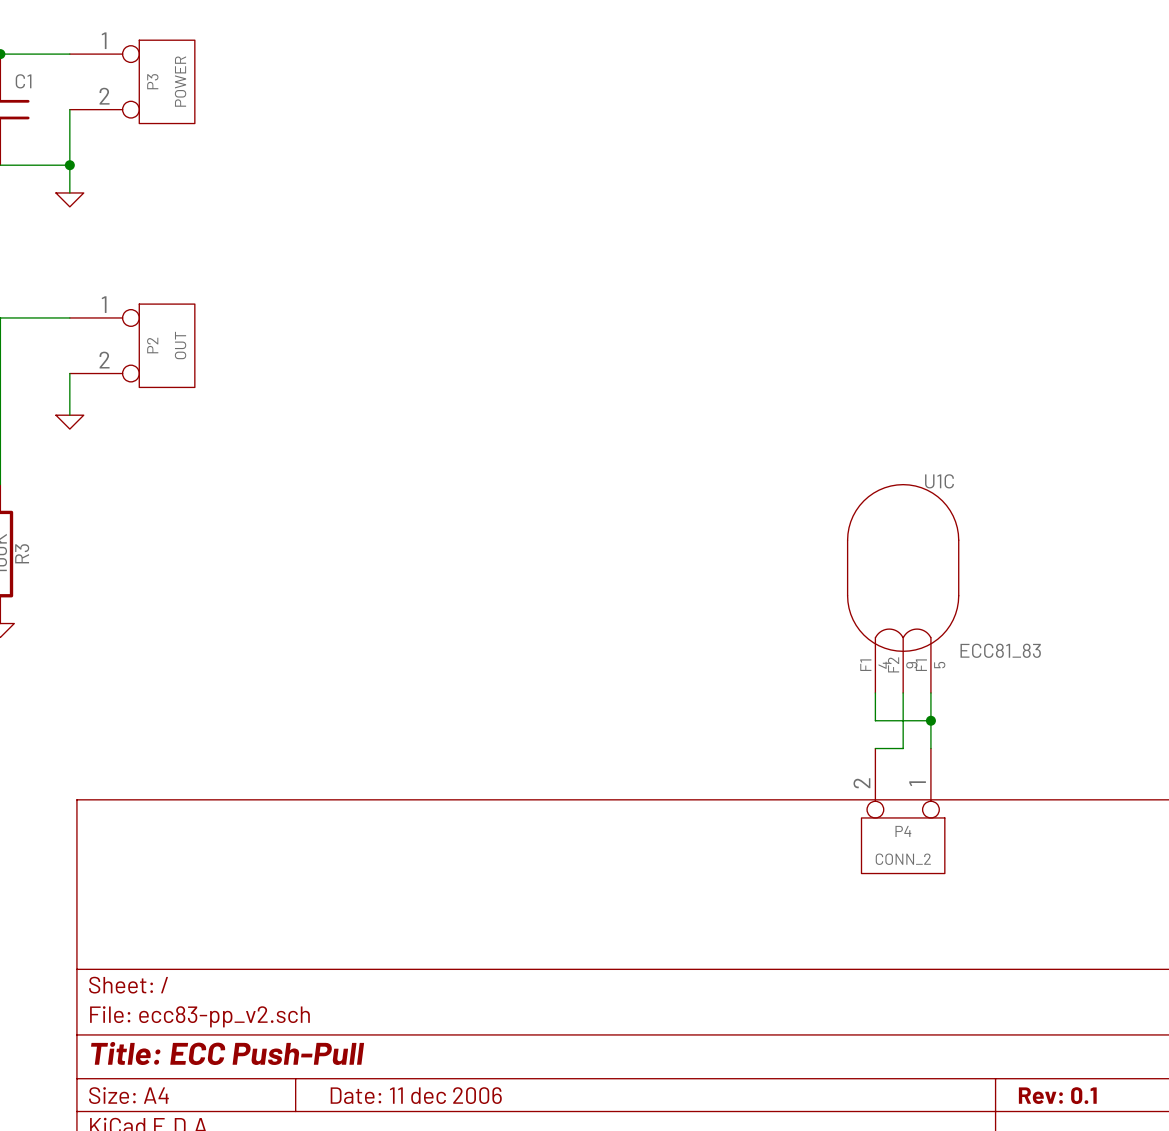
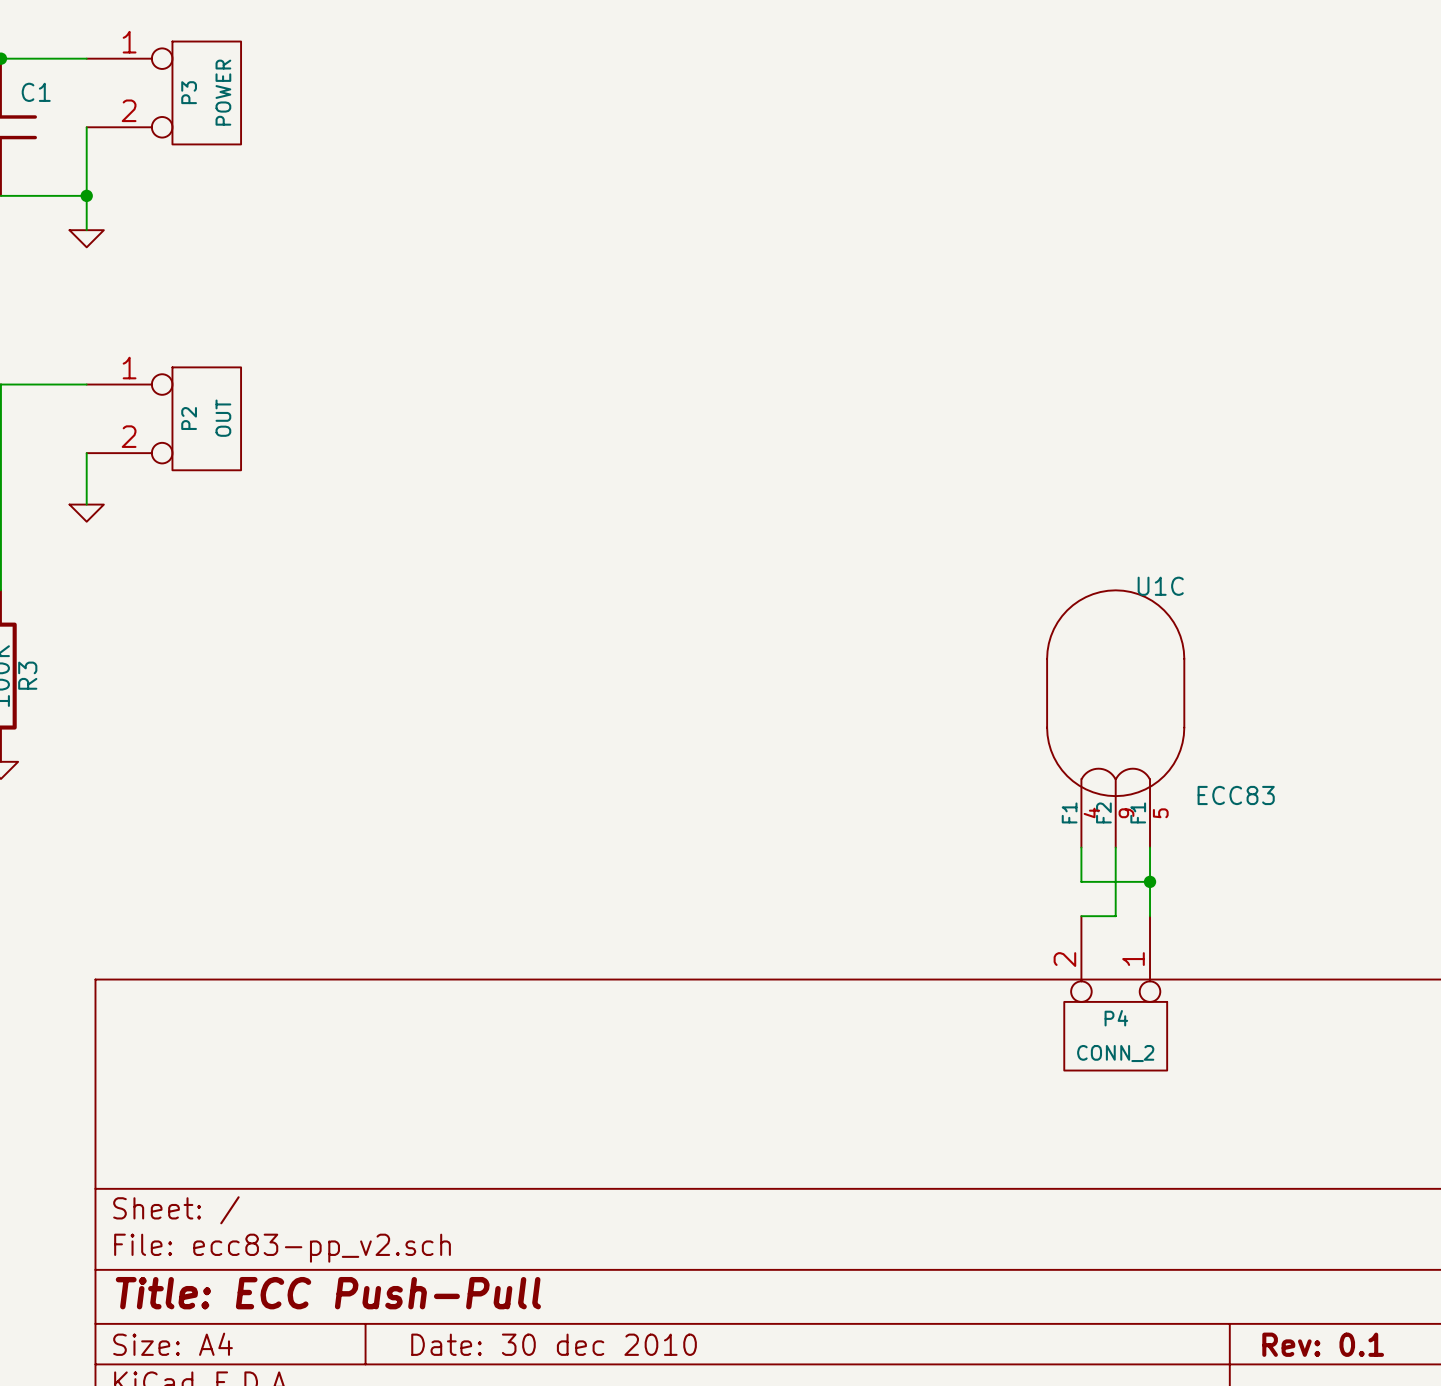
U1C value: ECC81_83 (1000, 650) -> ECC83 (1236, 795)
title block: Date: 11 dec 2006 (416, 1095) -> Date: 30 dec 2010 (554, 1344)

